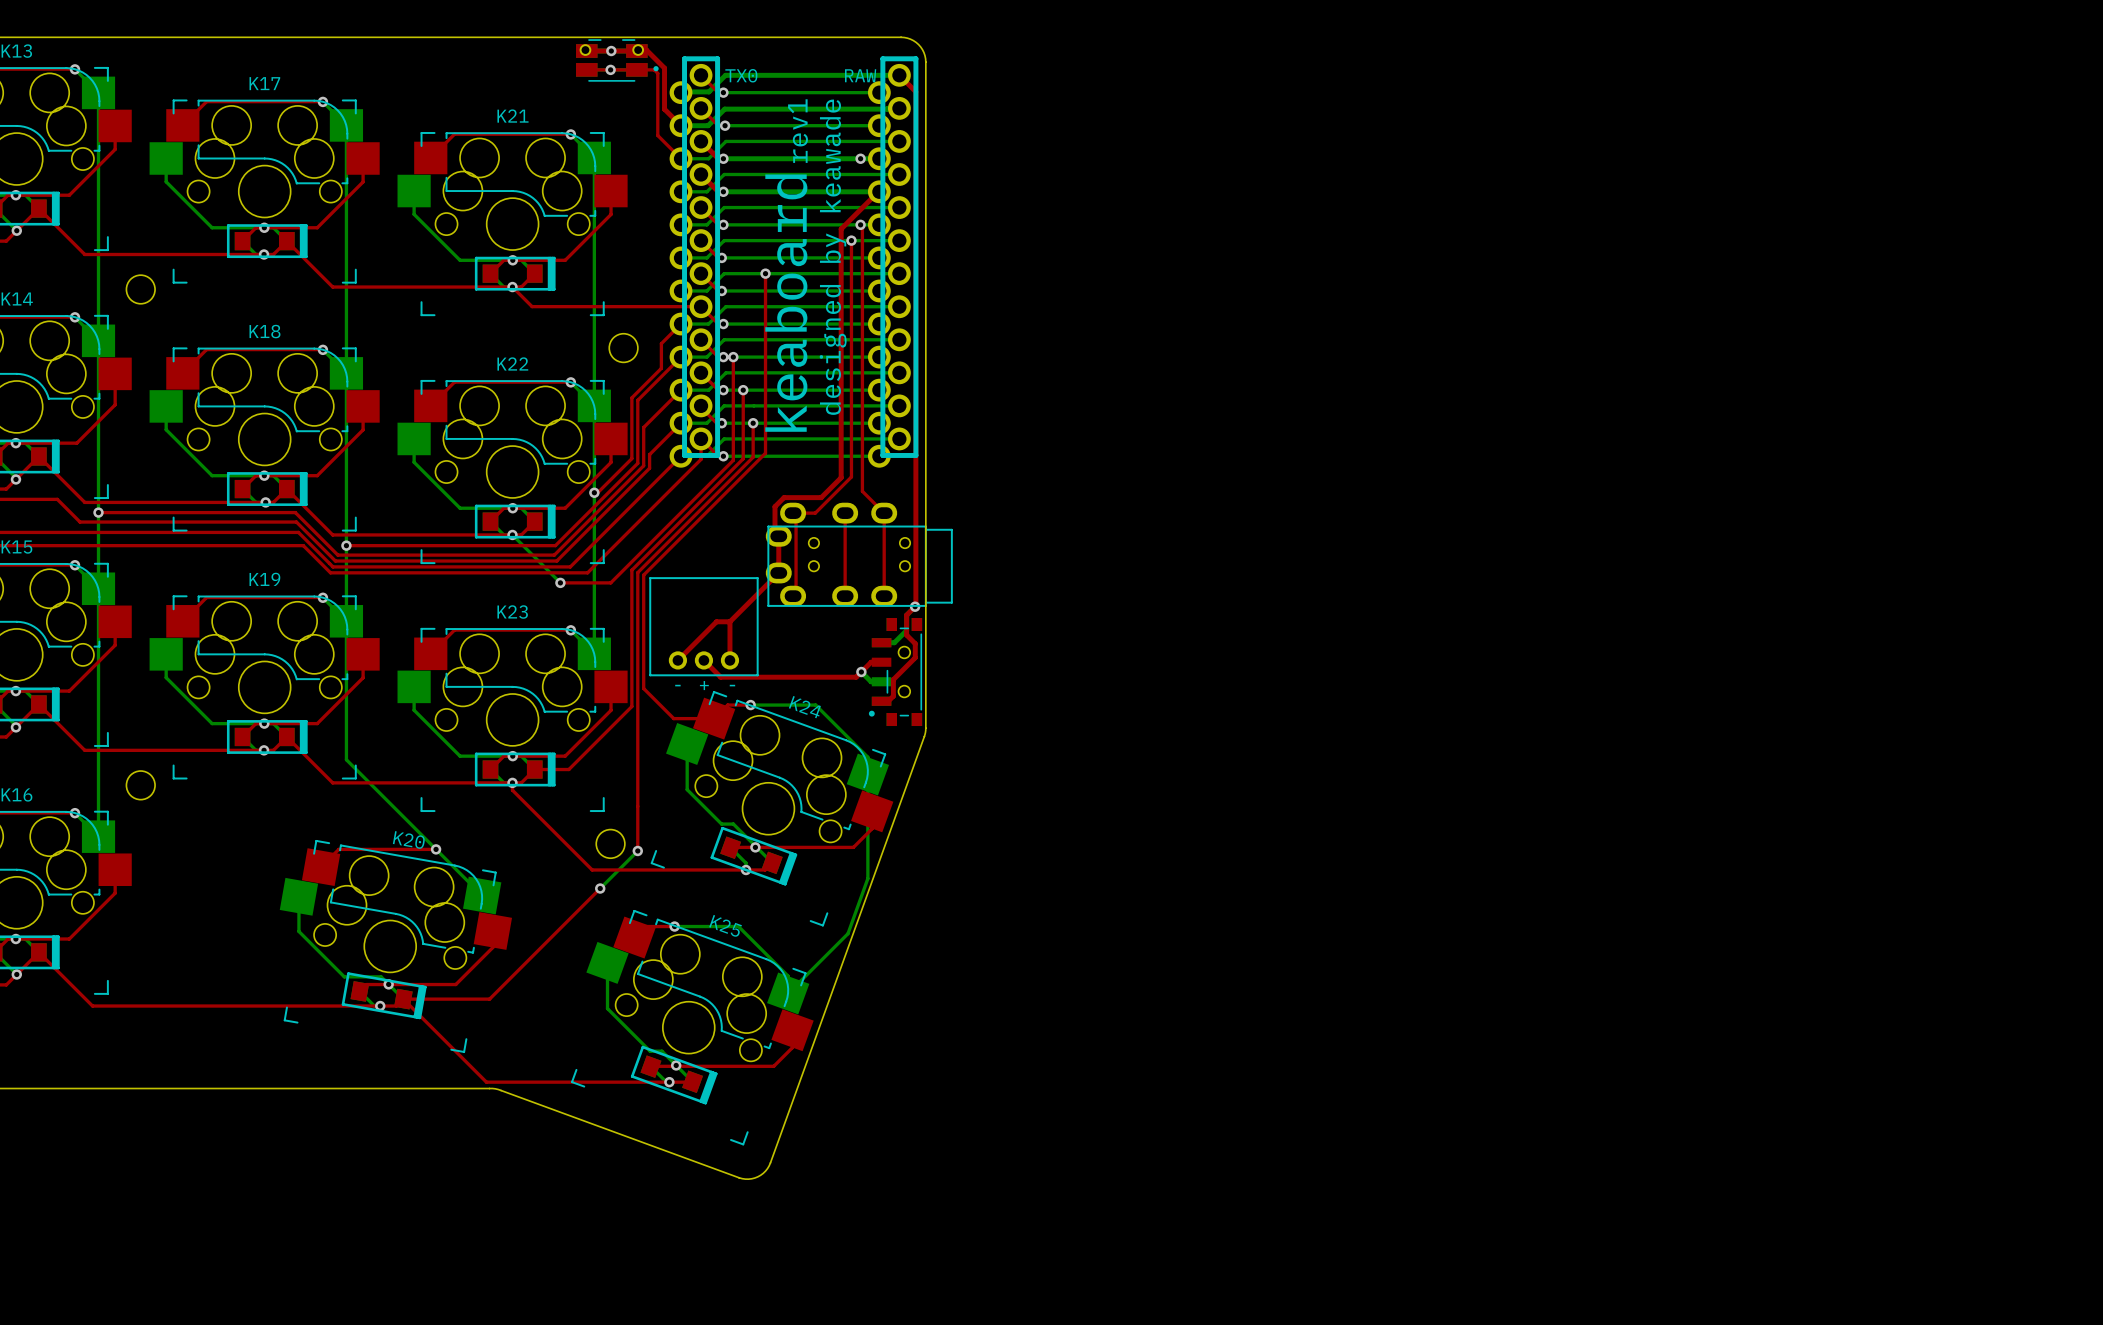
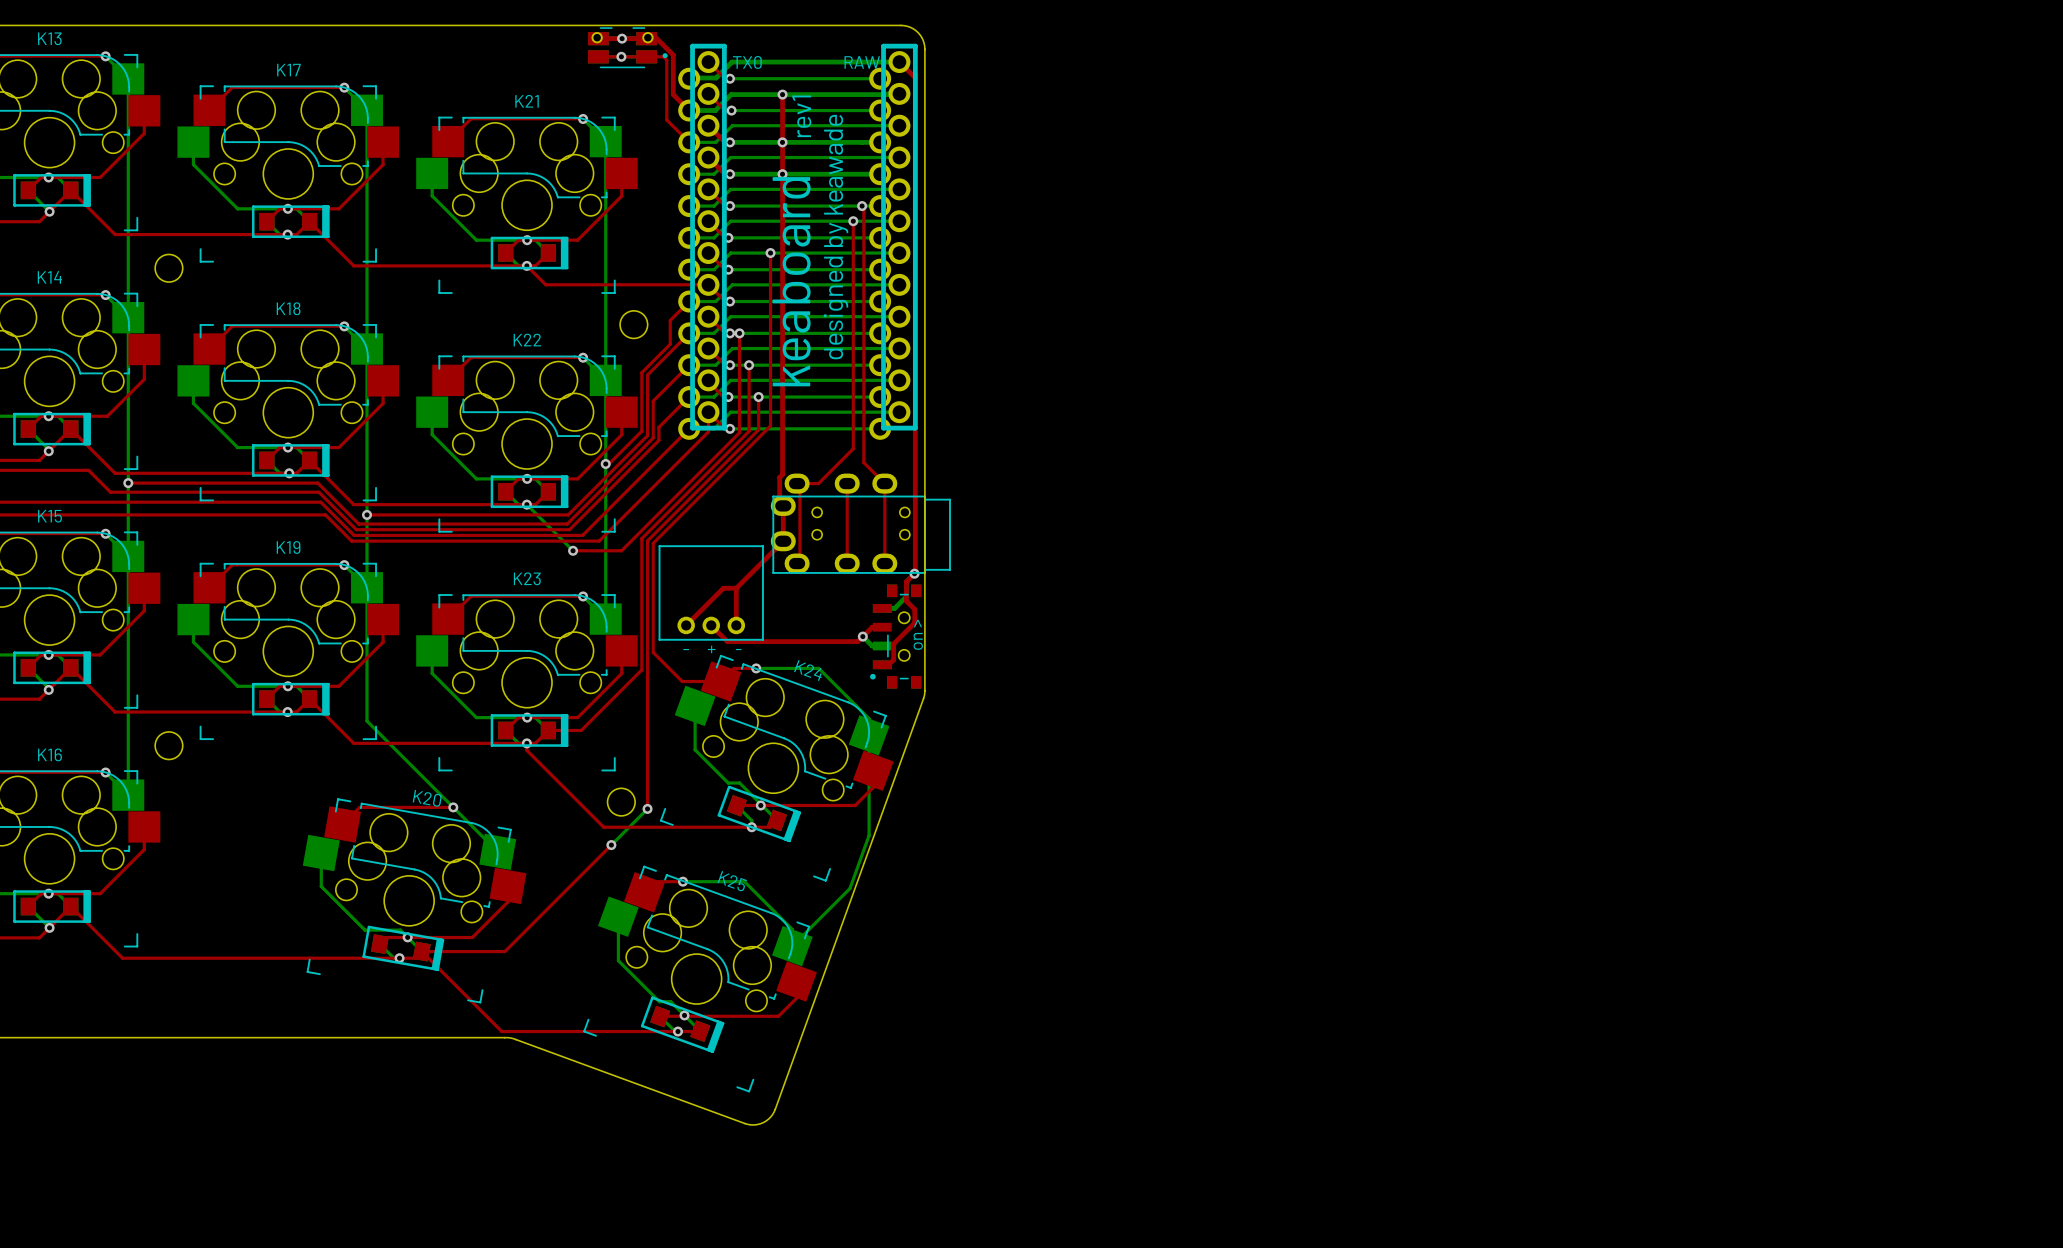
via: none -> (782, 94)
via: none -> (782, 142)
via: (860, 158) -> none
via: none -> (782, 174)
top track: (879, 191) (841, 229) (841, 477) (821, 497) (784, 497) (778, 503) -> (782, 94) (782, 474)
part footprint: [868, 617, 923, 727] -> [870, 584, 922, 689]
text: none -> on > (918, 634)

